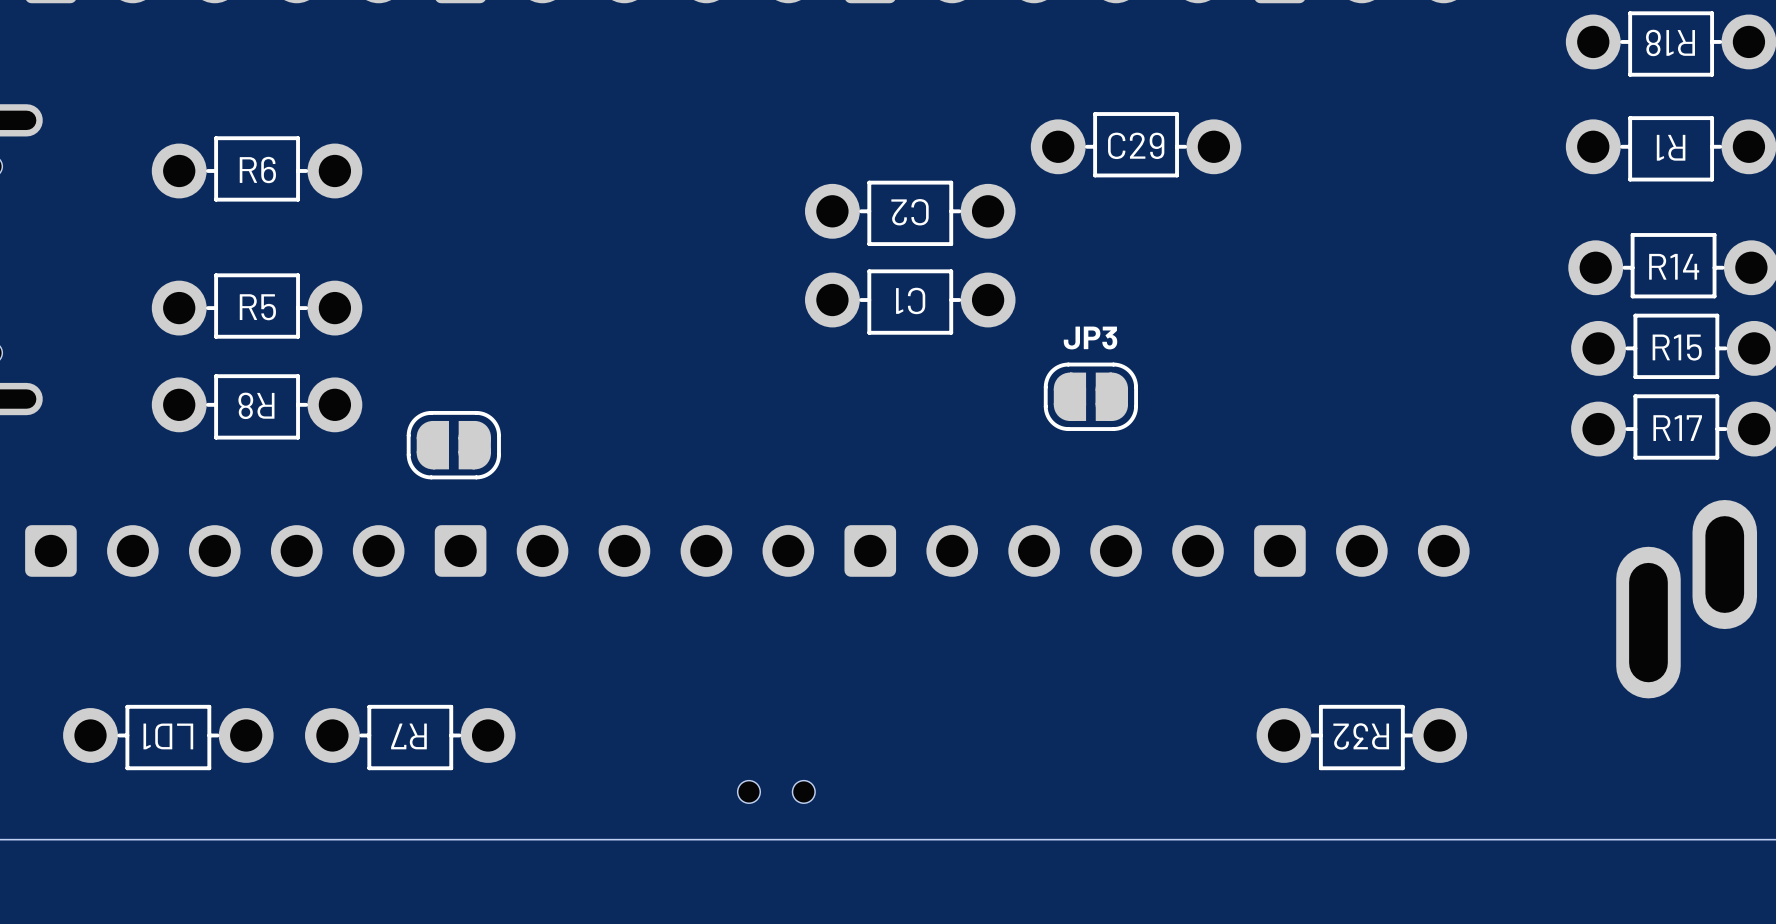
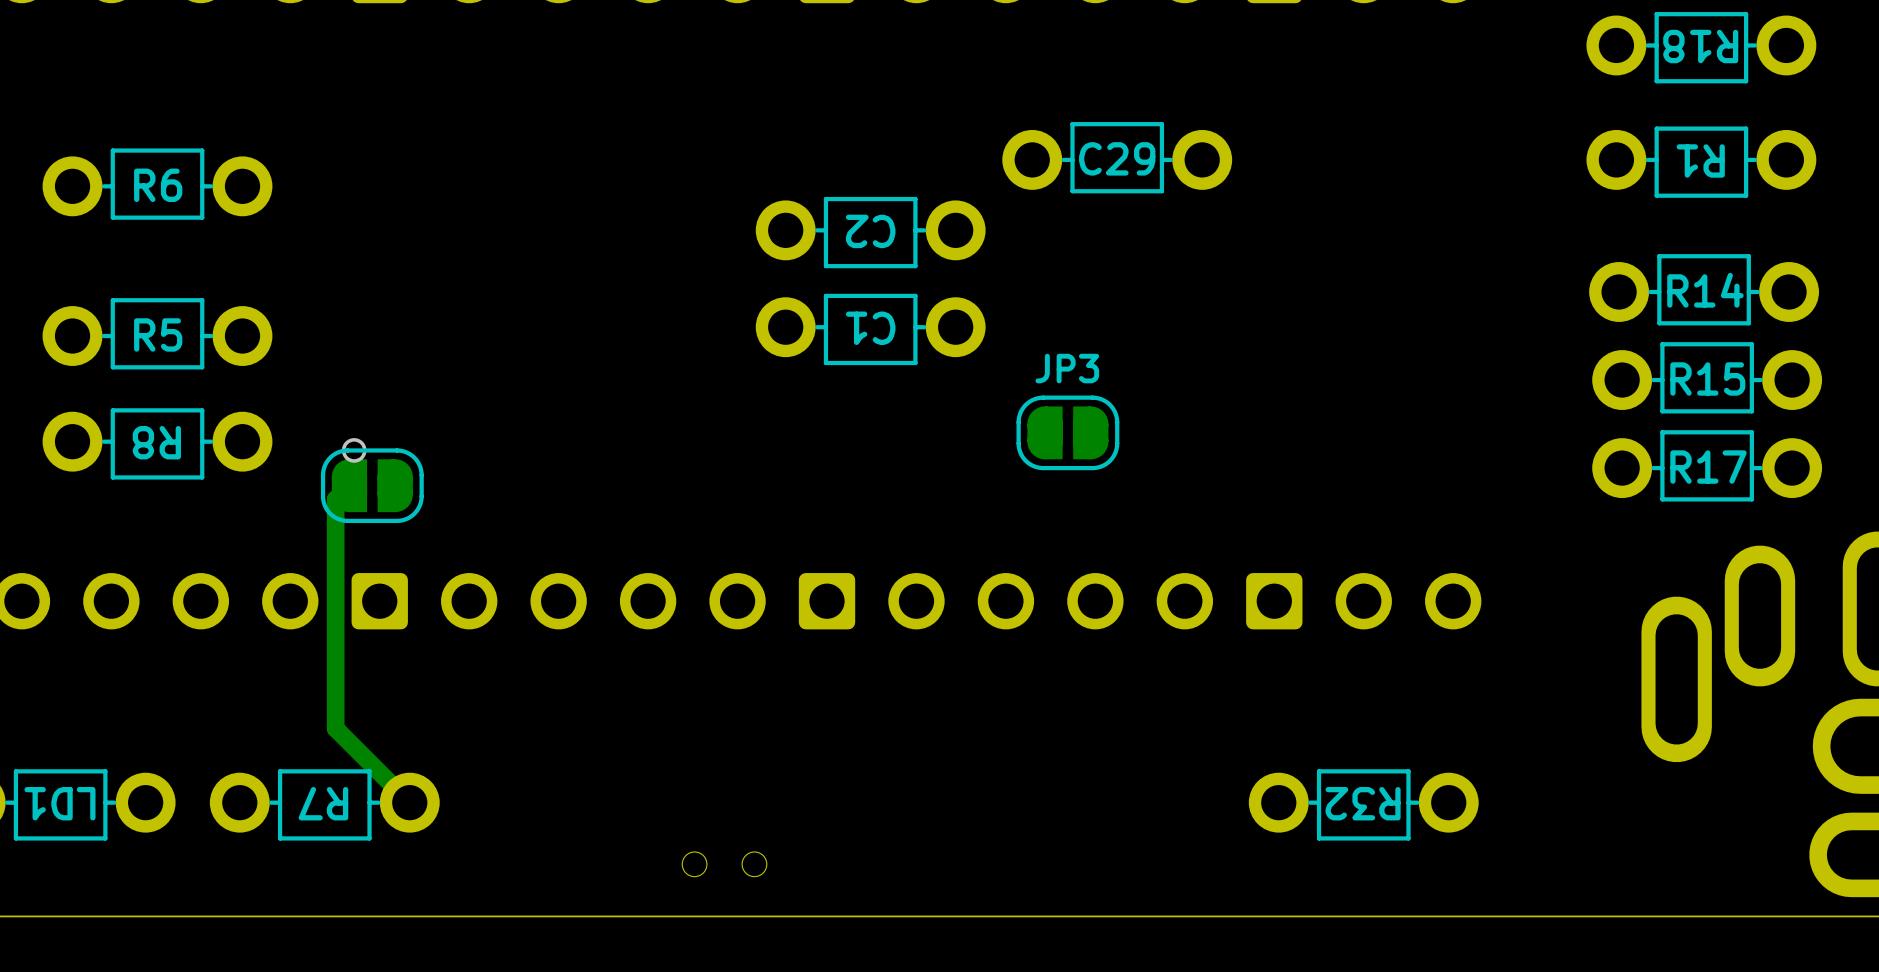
track: none -> (354, 450) (354, 480) (335, 499) (335, 728) (409, 802)
via: none -> (354, 450)

